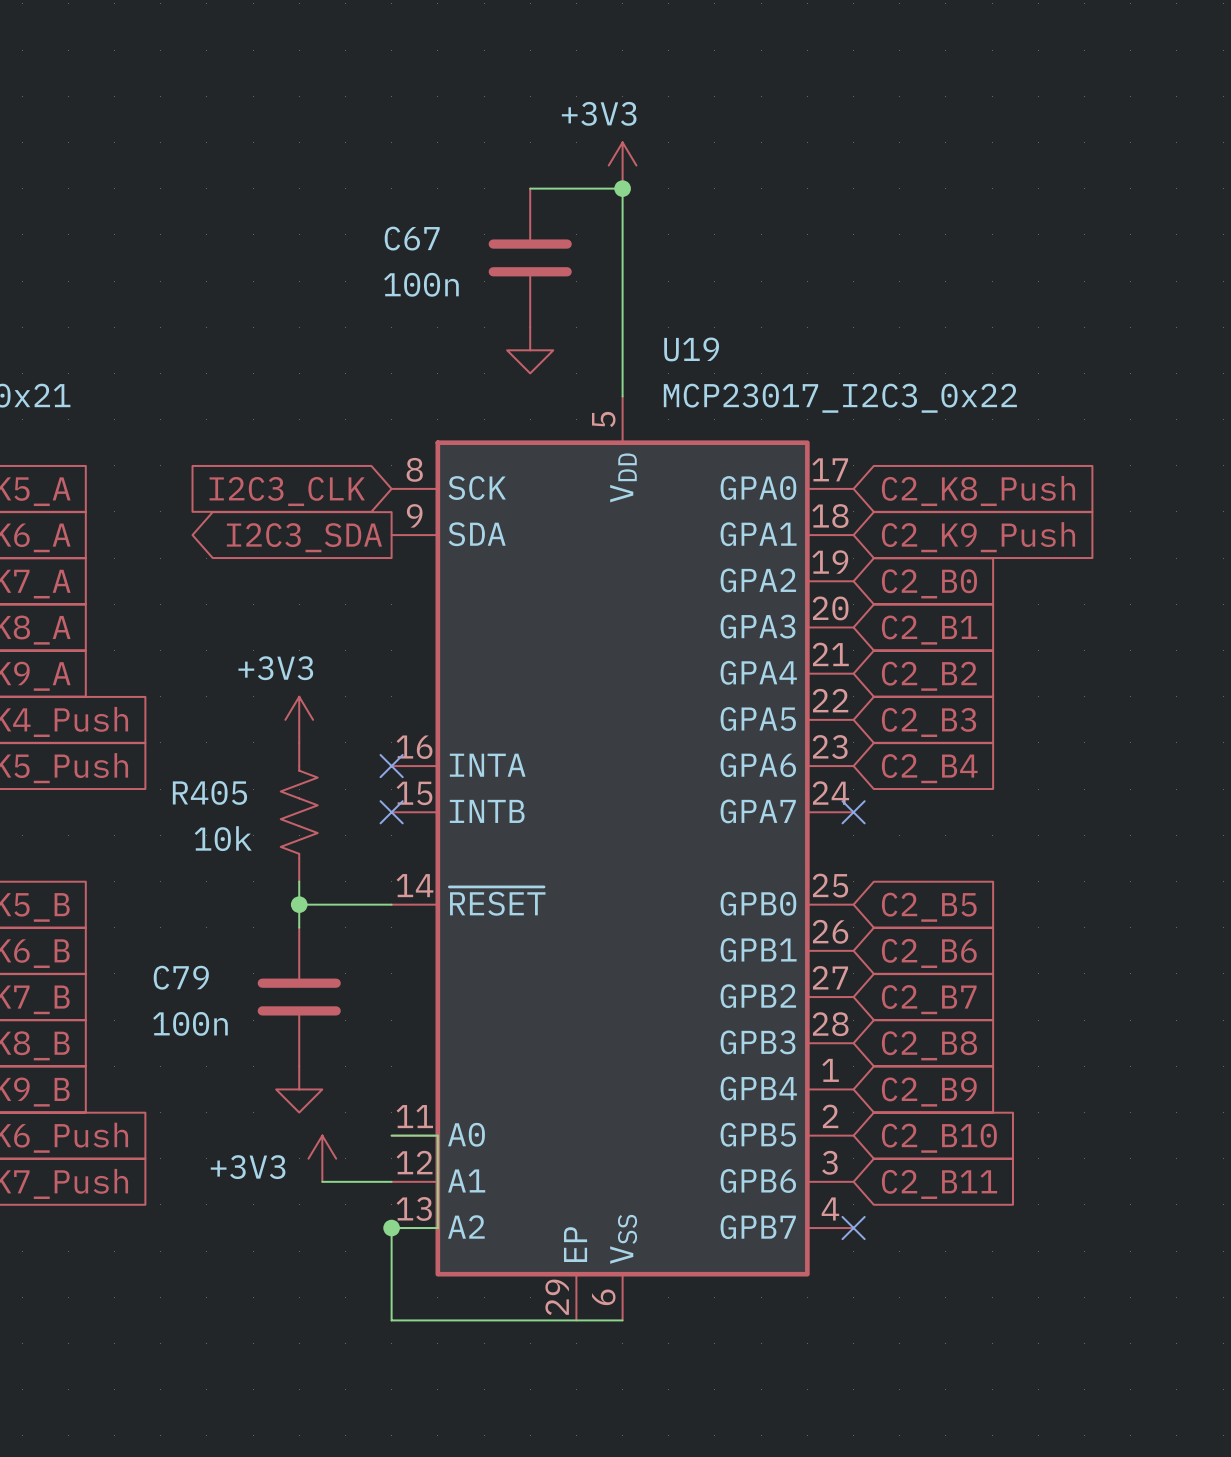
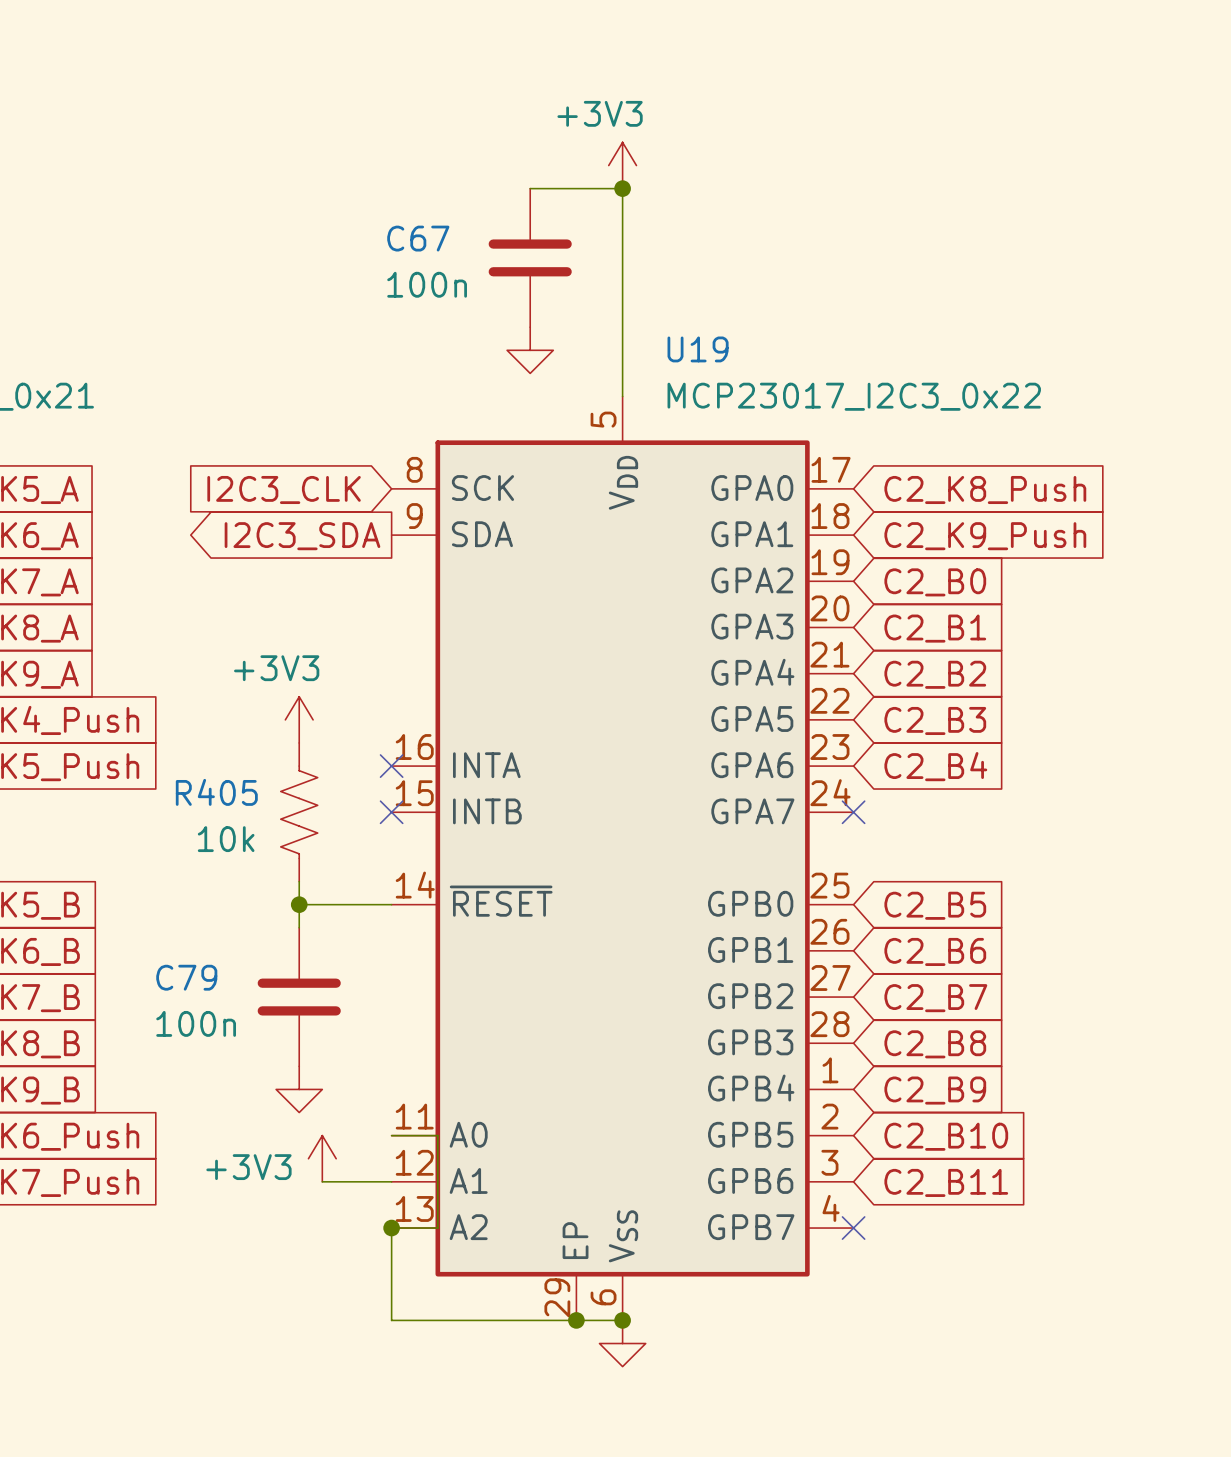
junction: none -> (576, 1320)
junction: none -> (622, 1320)
power symbol: none -> (622, 1343)

